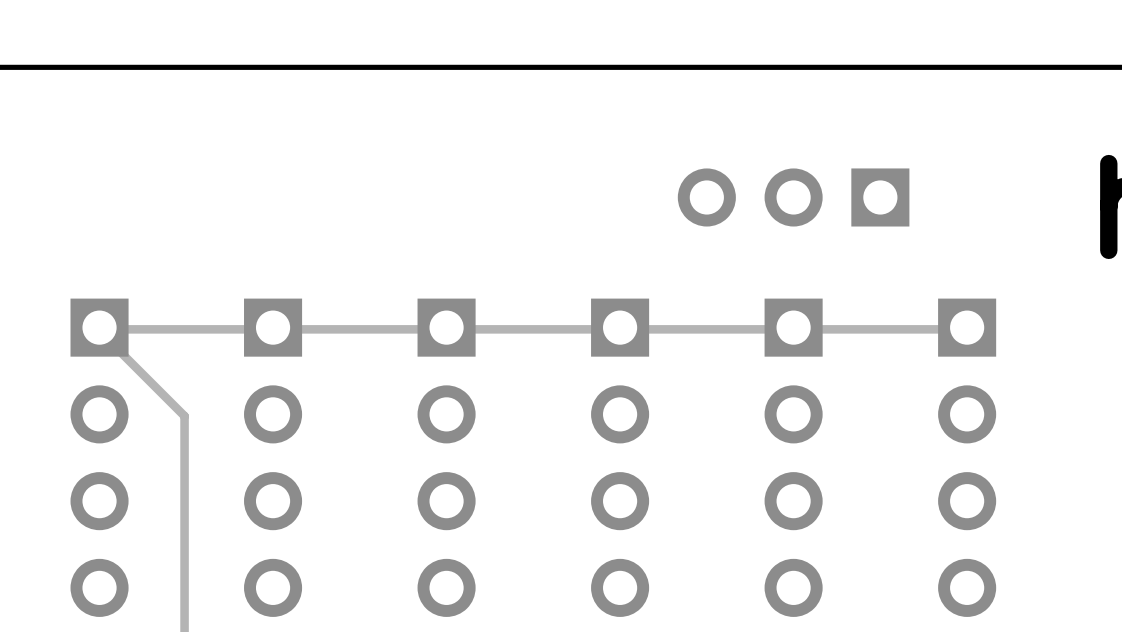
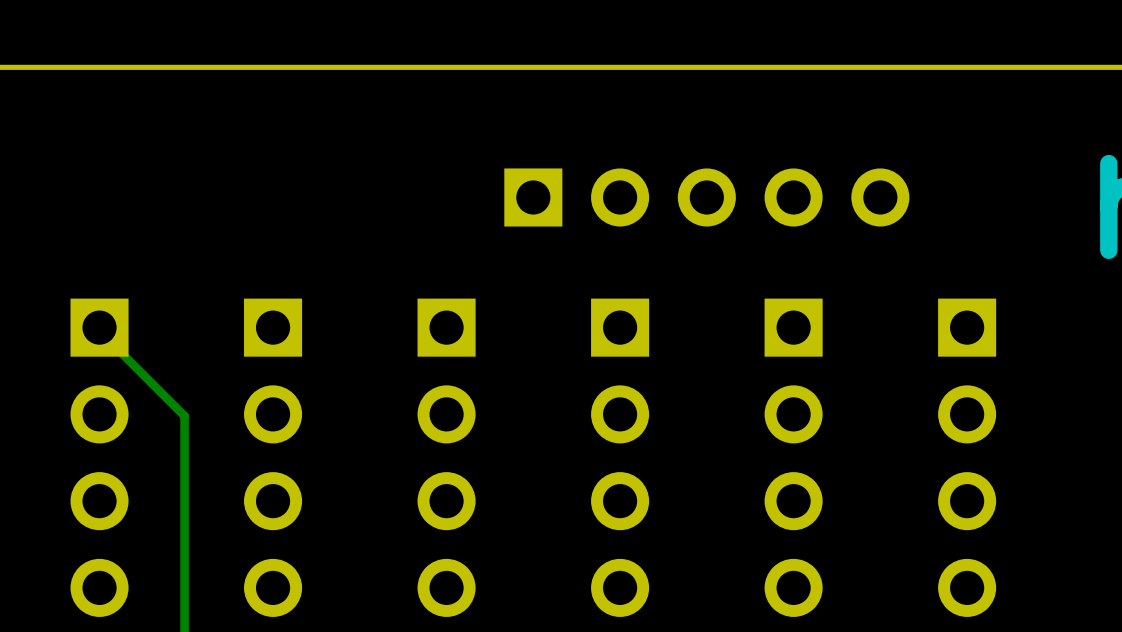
part: none -> (706, 197)
part: (793, 197) -> none
track: (965, 329) (97, 329) -> none

